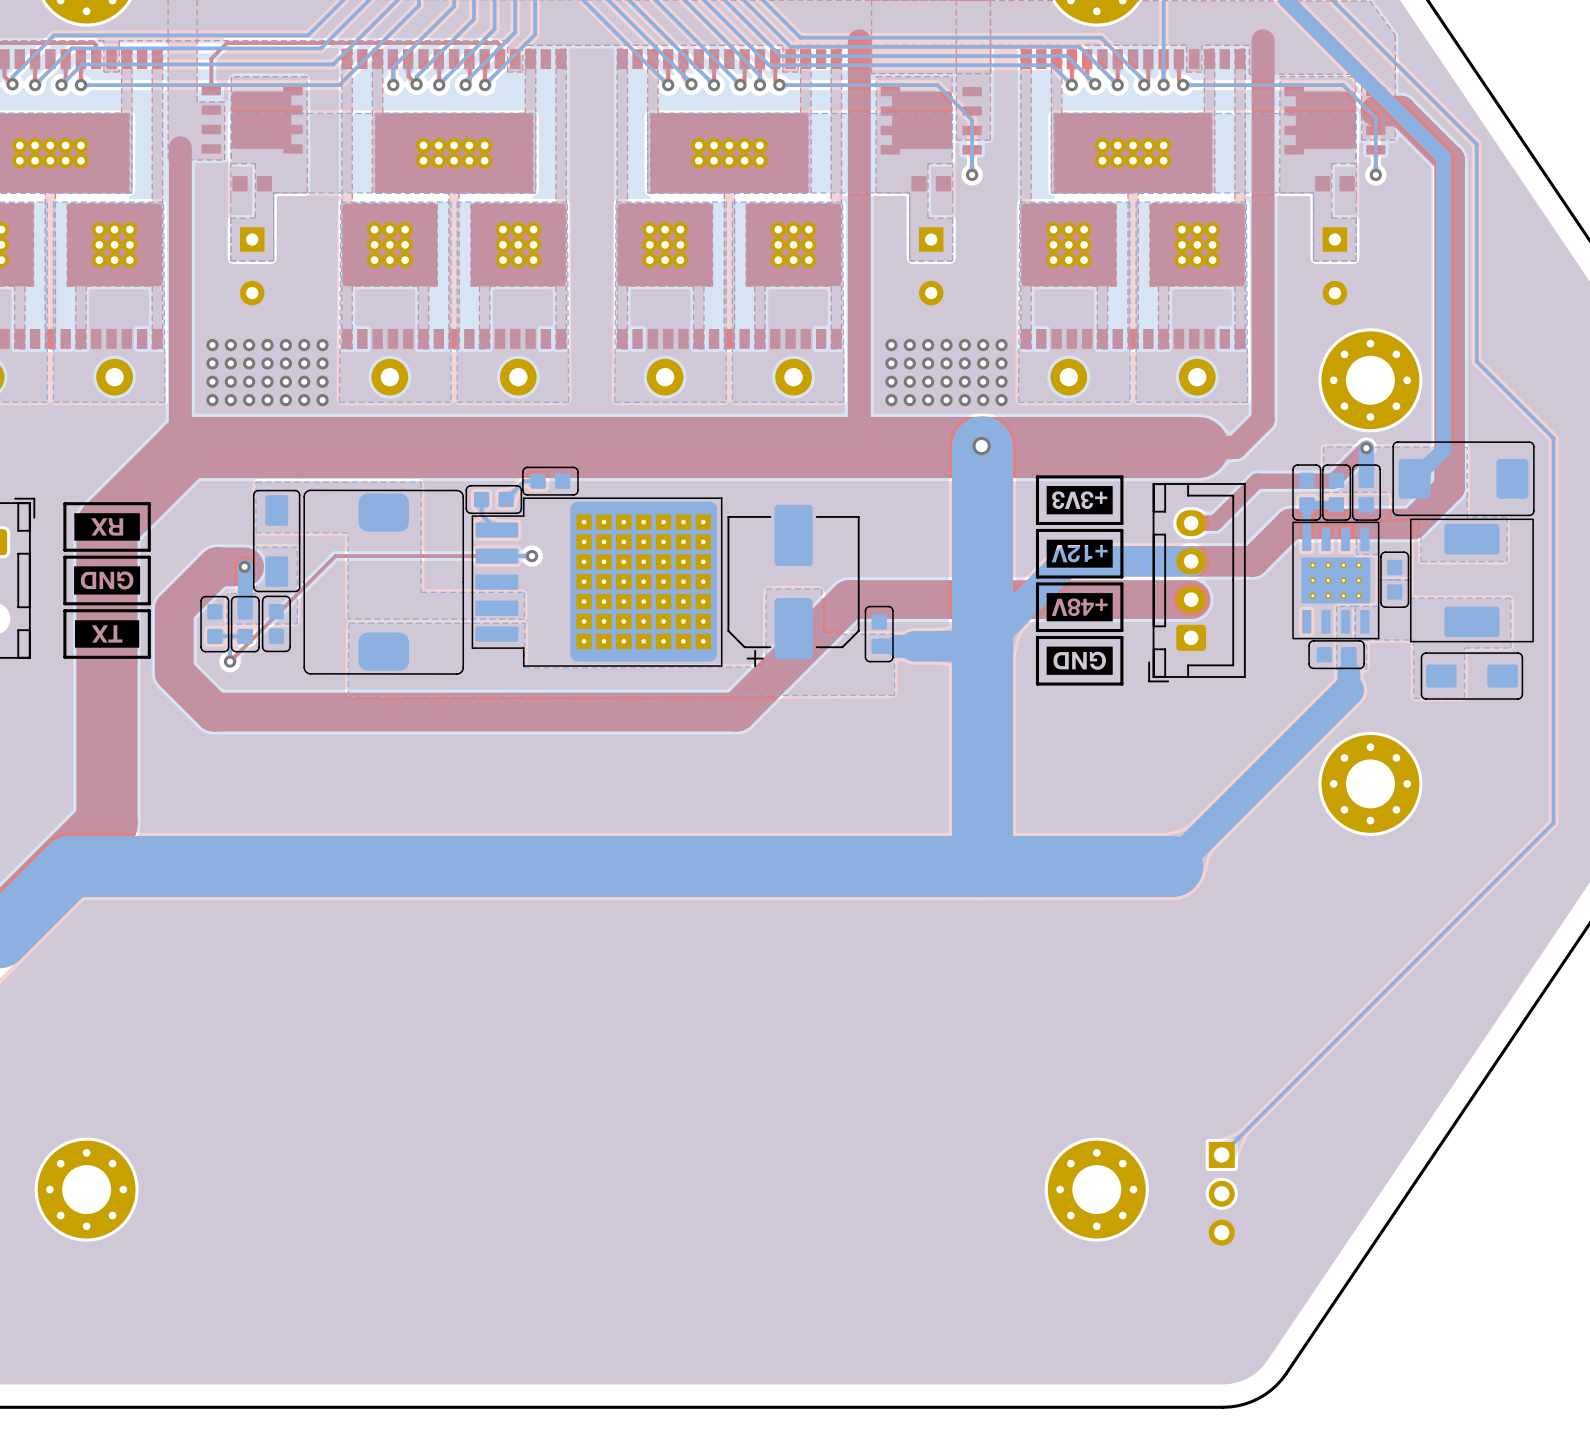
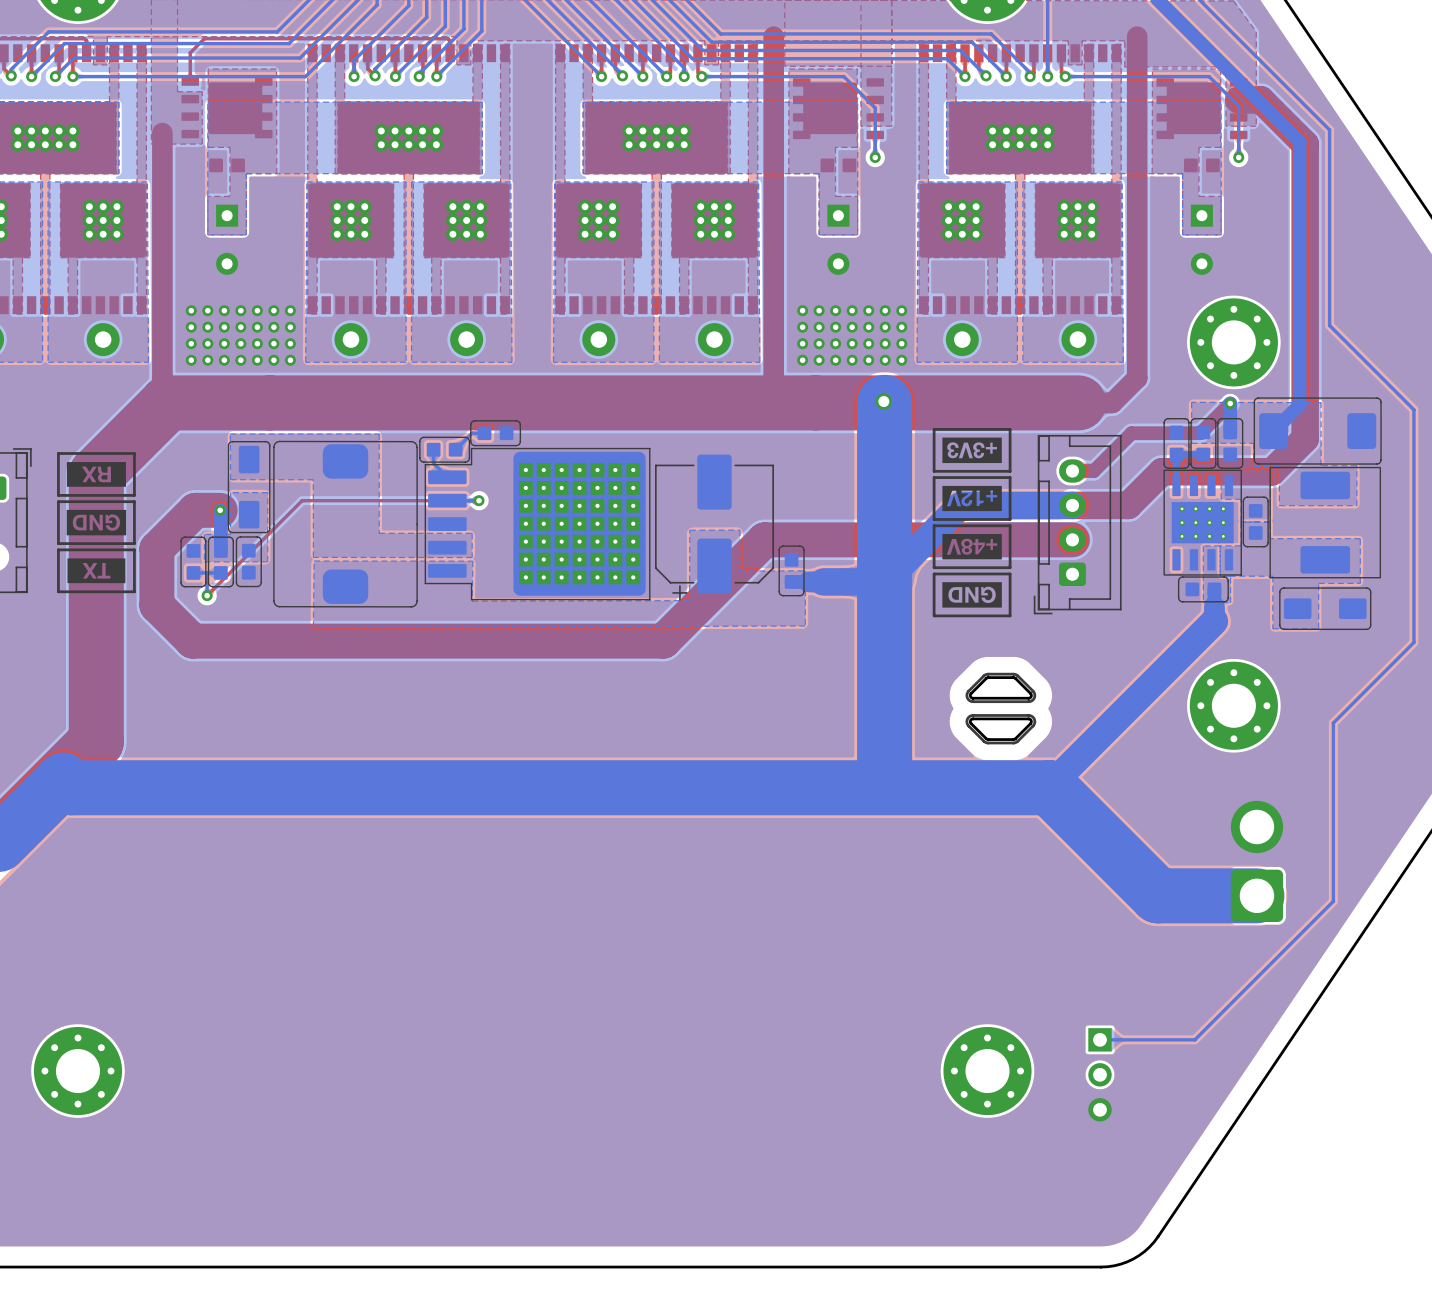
bottom track: (1553, 438) (1553, 823) (1221, 1154) -> (1398, 394) (1413, 409) (1413, 642) (1333, 723) (1333, 901) (1194, 1039) (1100, 1039)
drawing: none -> [965, 672, 1037, 745]
bottom track: (1172, 866) (70, 866) -> (1256, 895) (1157, 895) (1049, 787) (70, 787) (63, 780)
part: none -> (1256, 861)

